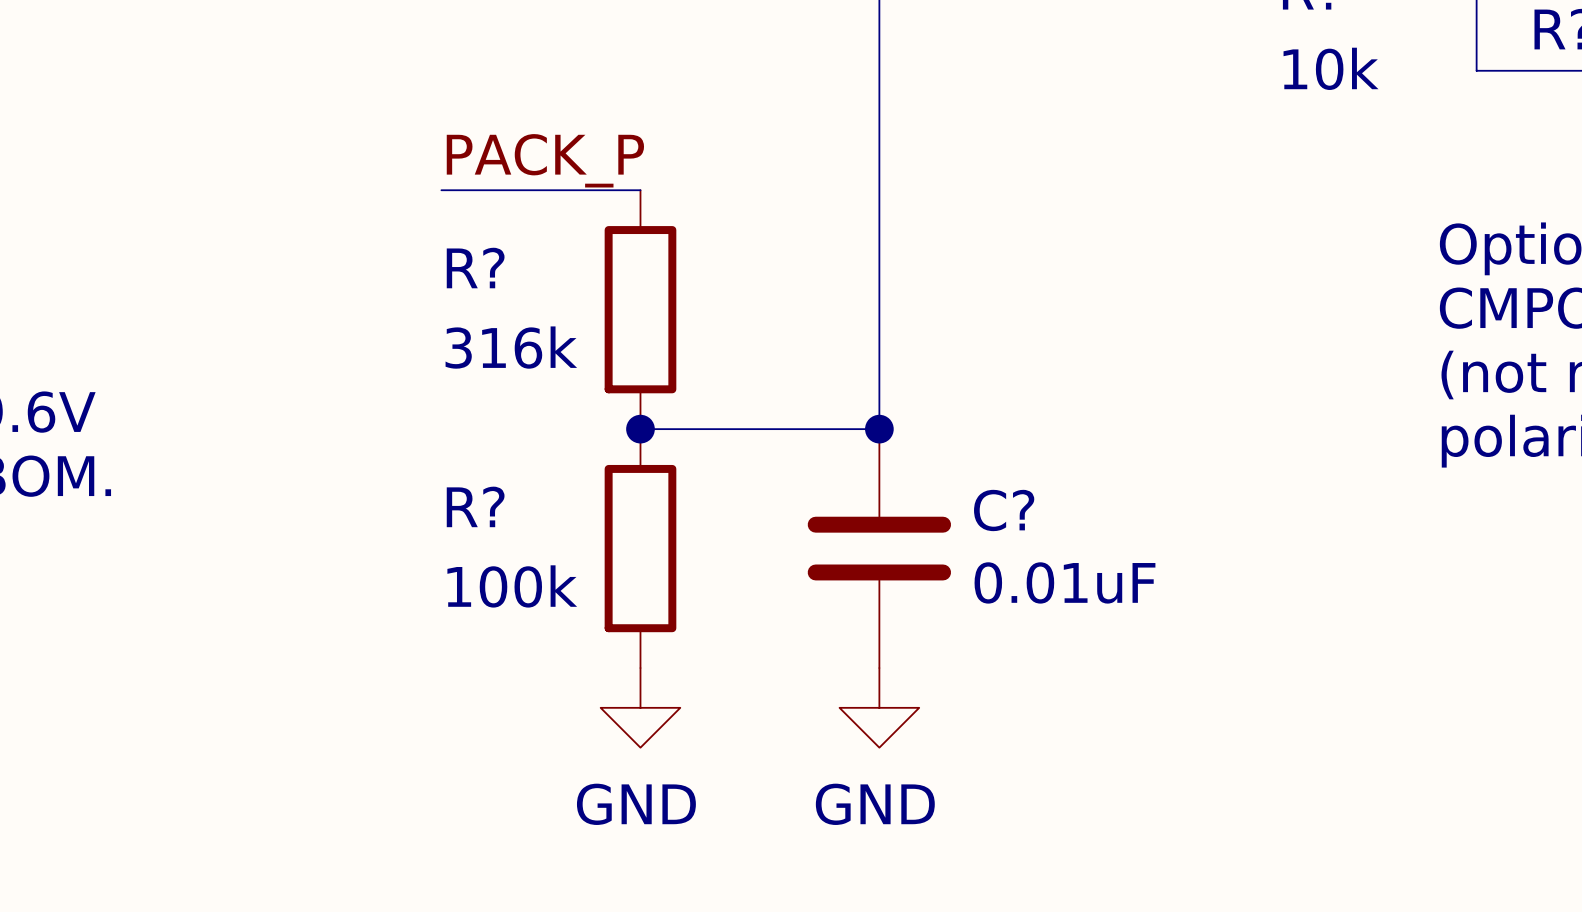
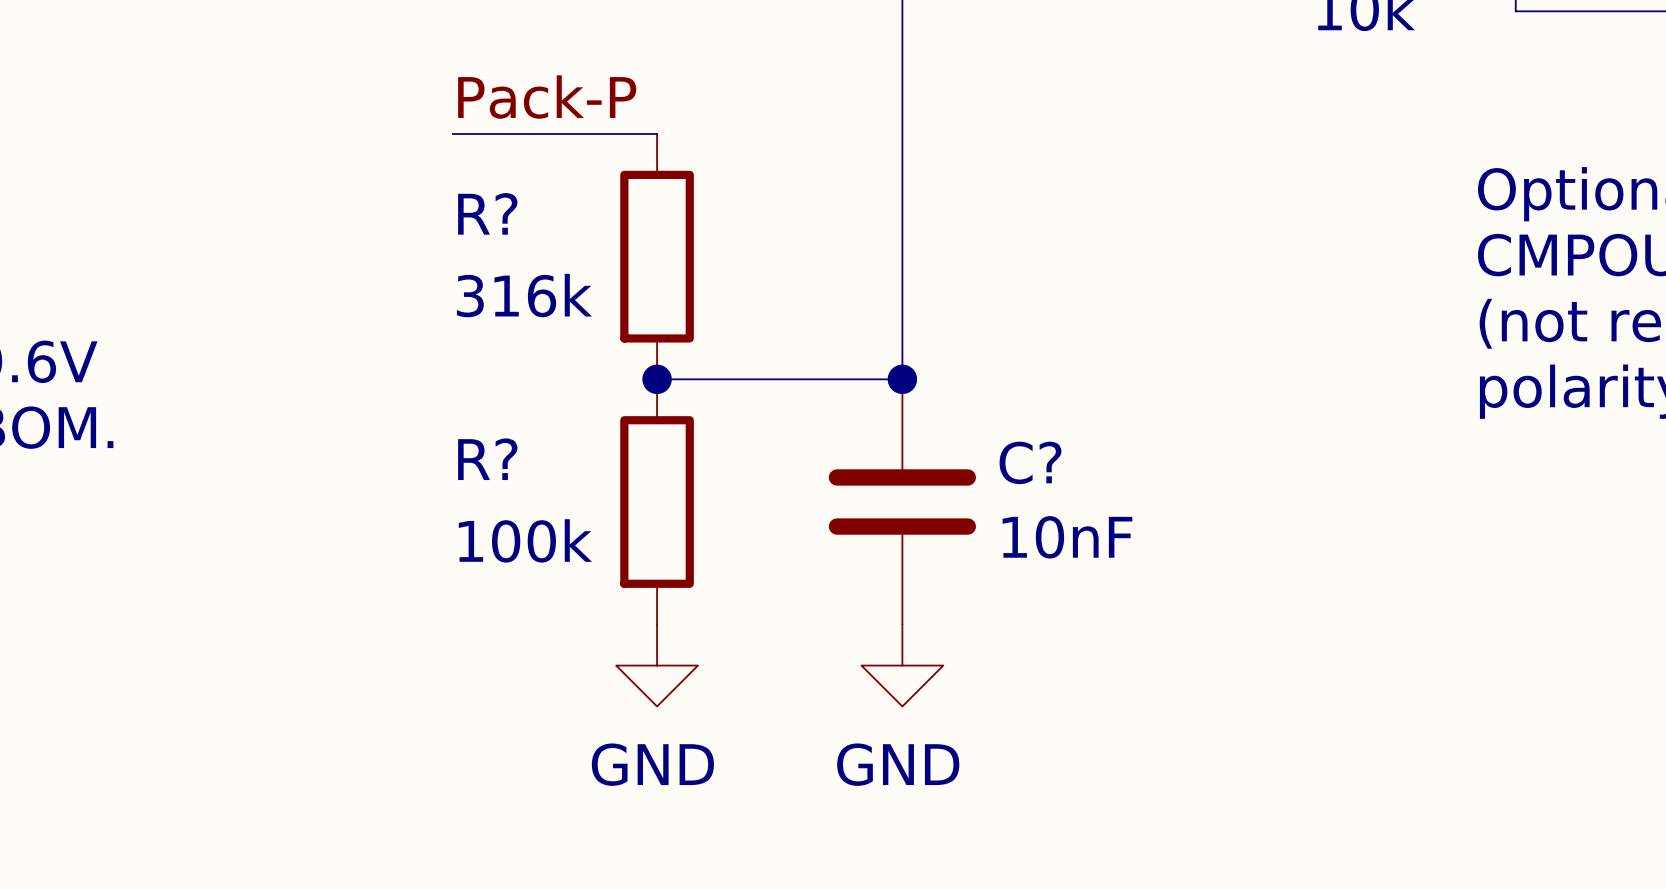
label: PACK_P (545, 160) -> Pack-P (547, 97)
C? value: 0.01uF (1064, 582) -> 10nF (1067, 537)

